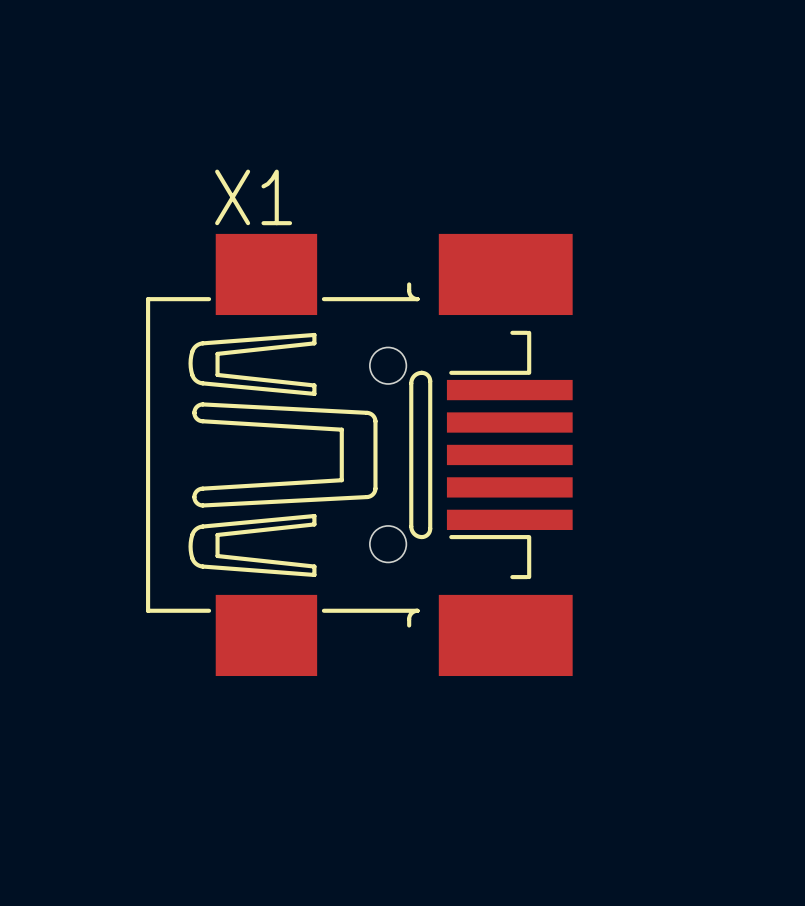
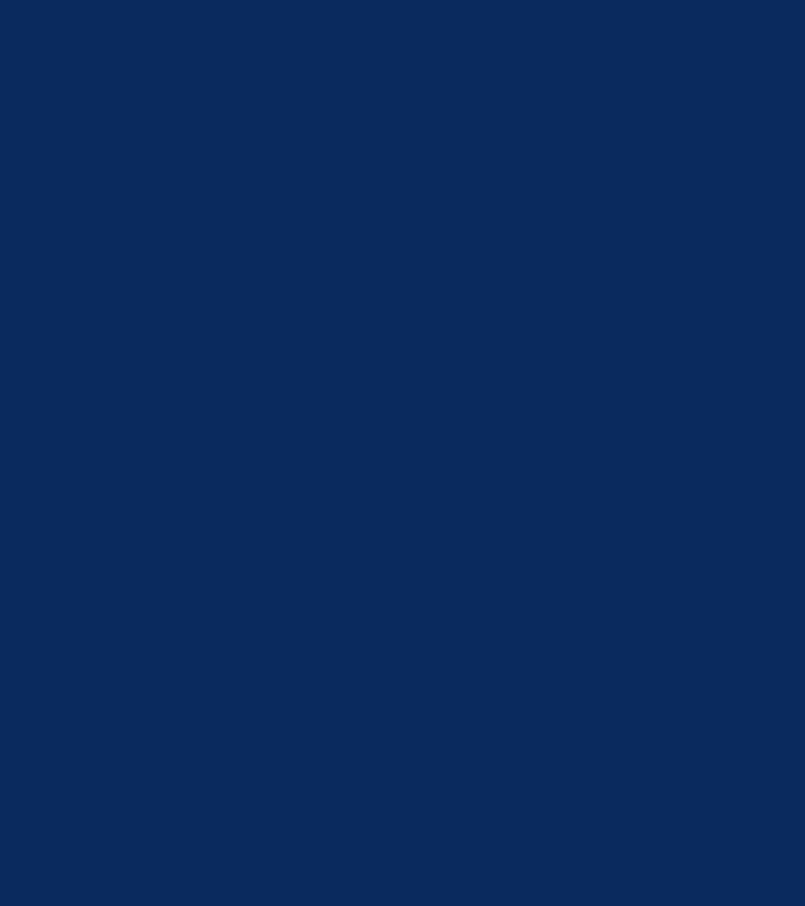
X1: (359, 454) -> none

